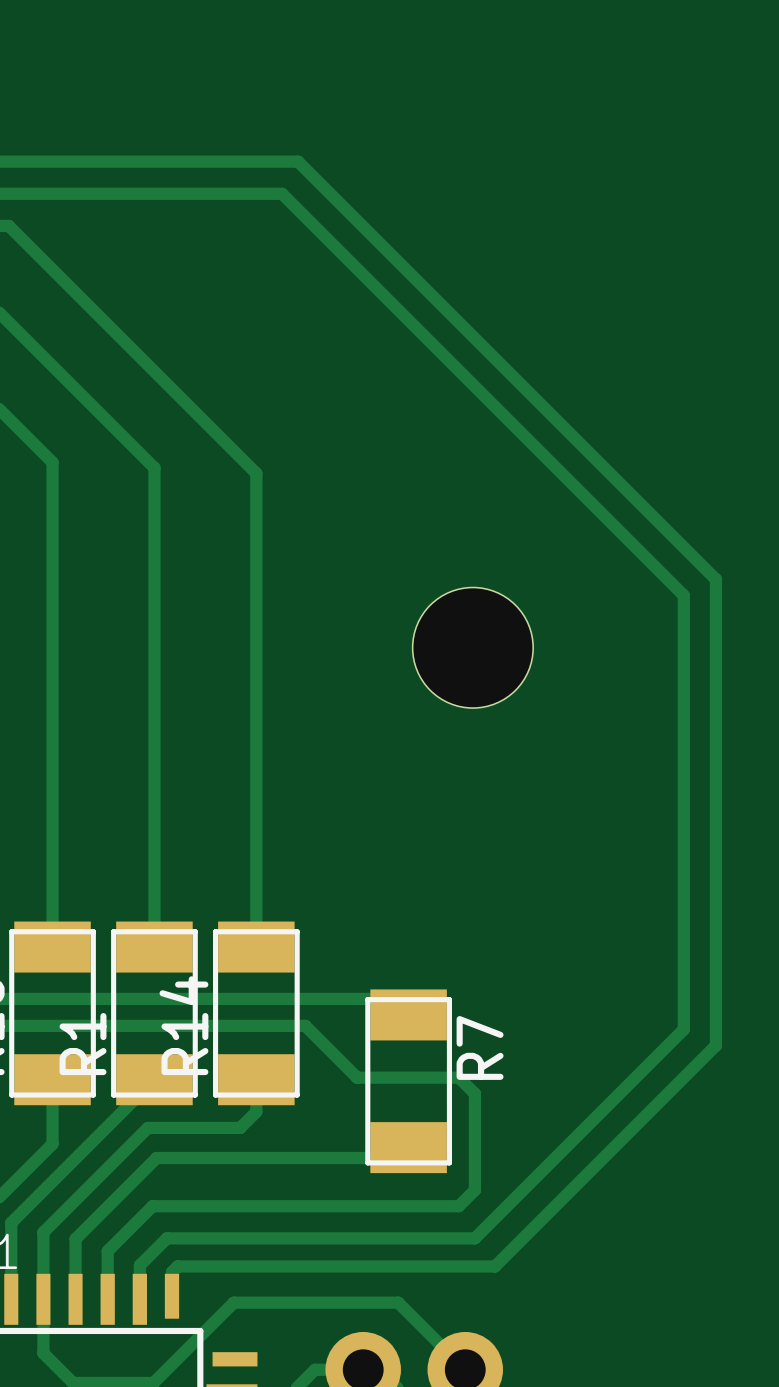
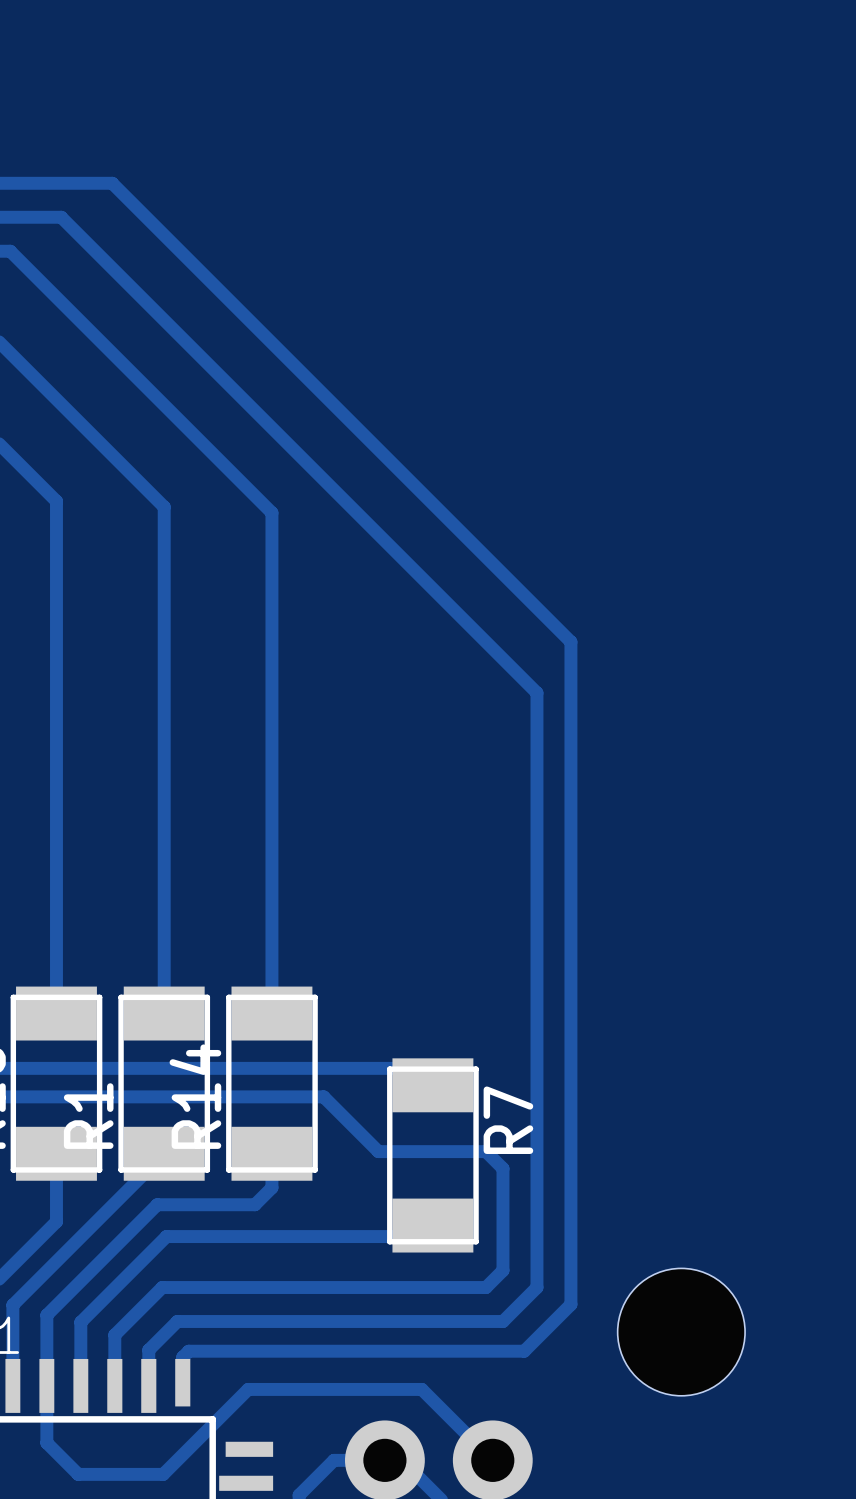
track: (105, 161) (298, 161) (715, 579) (715, 1045) (539, 1222) -> (112, 183) (570, 641) (570, 1304)
track: (57, 193) (282, 193) (683, 595) (683, 1029) (507, 1206) -> (61, 217) (536, 692) (536, 1287)
hole position: (472, 647) -> (681, 1332)

